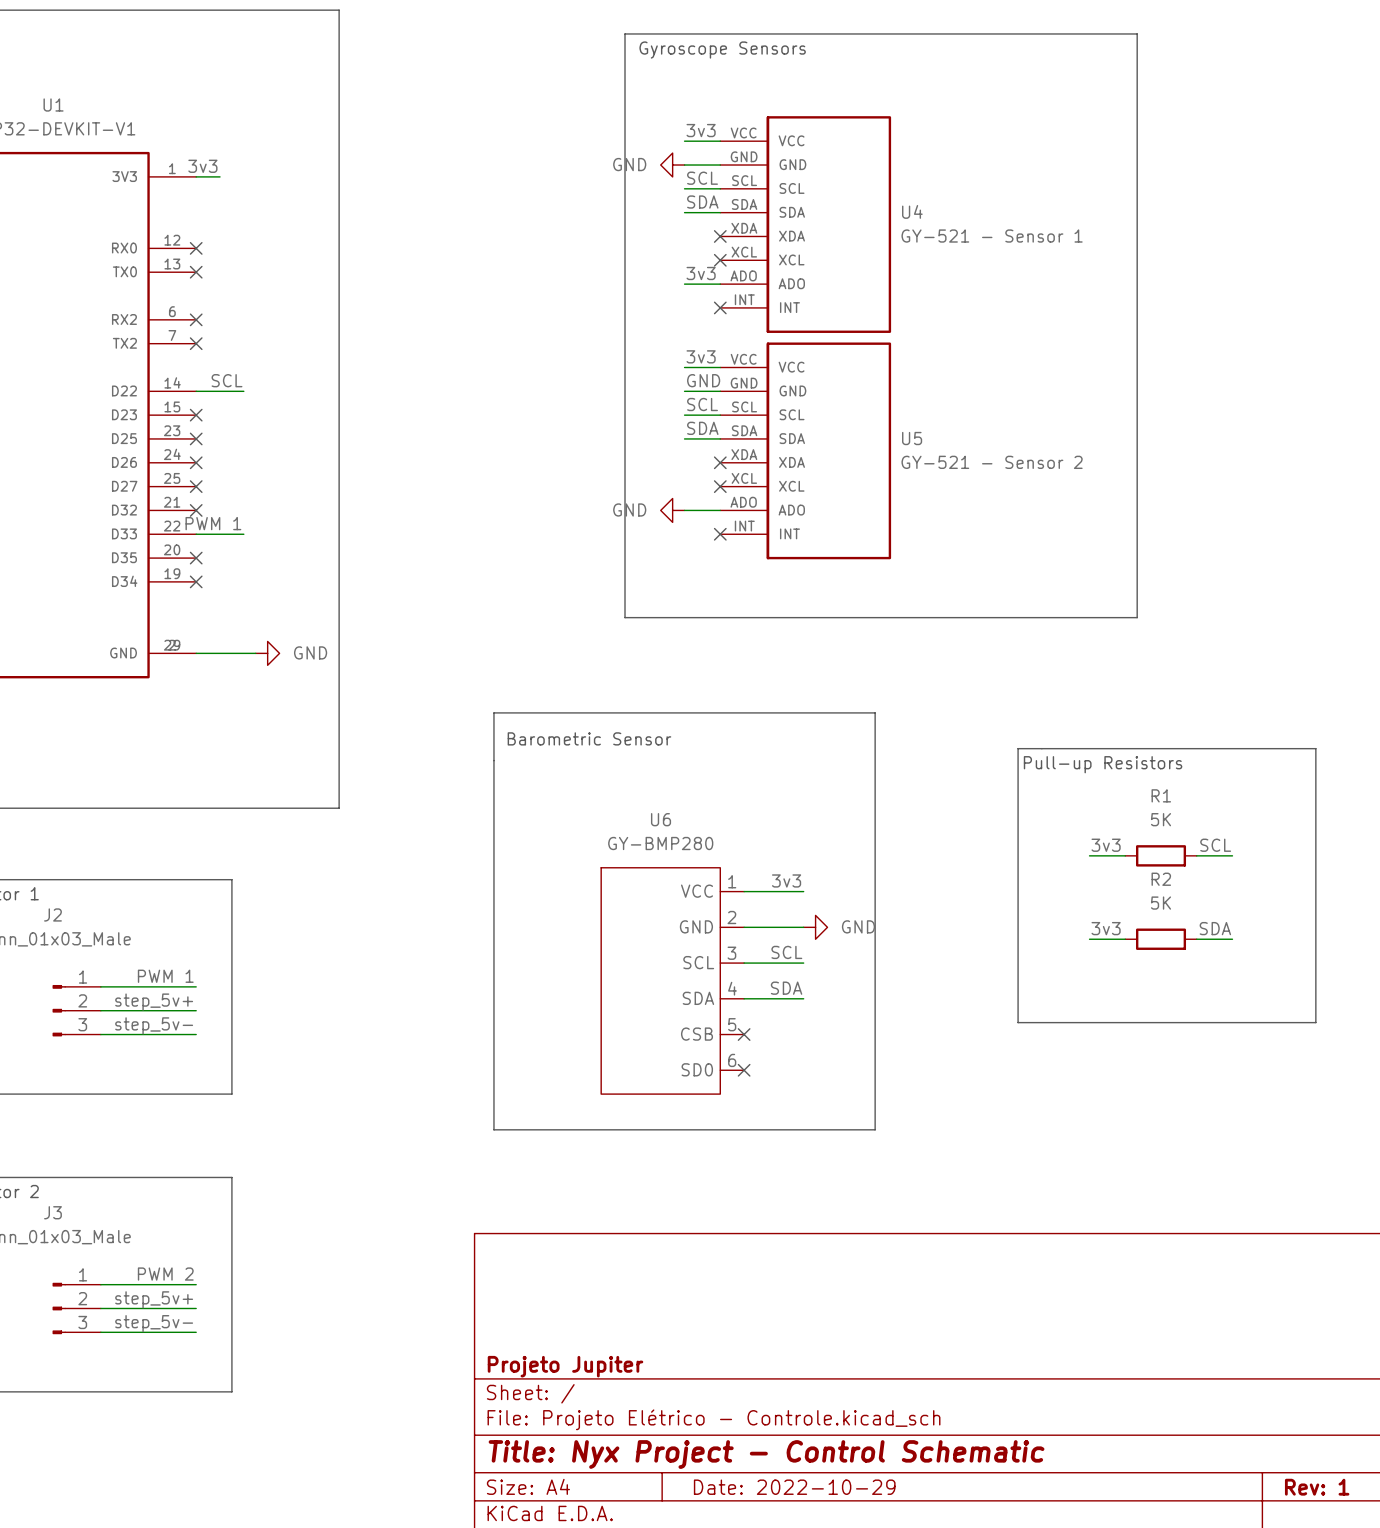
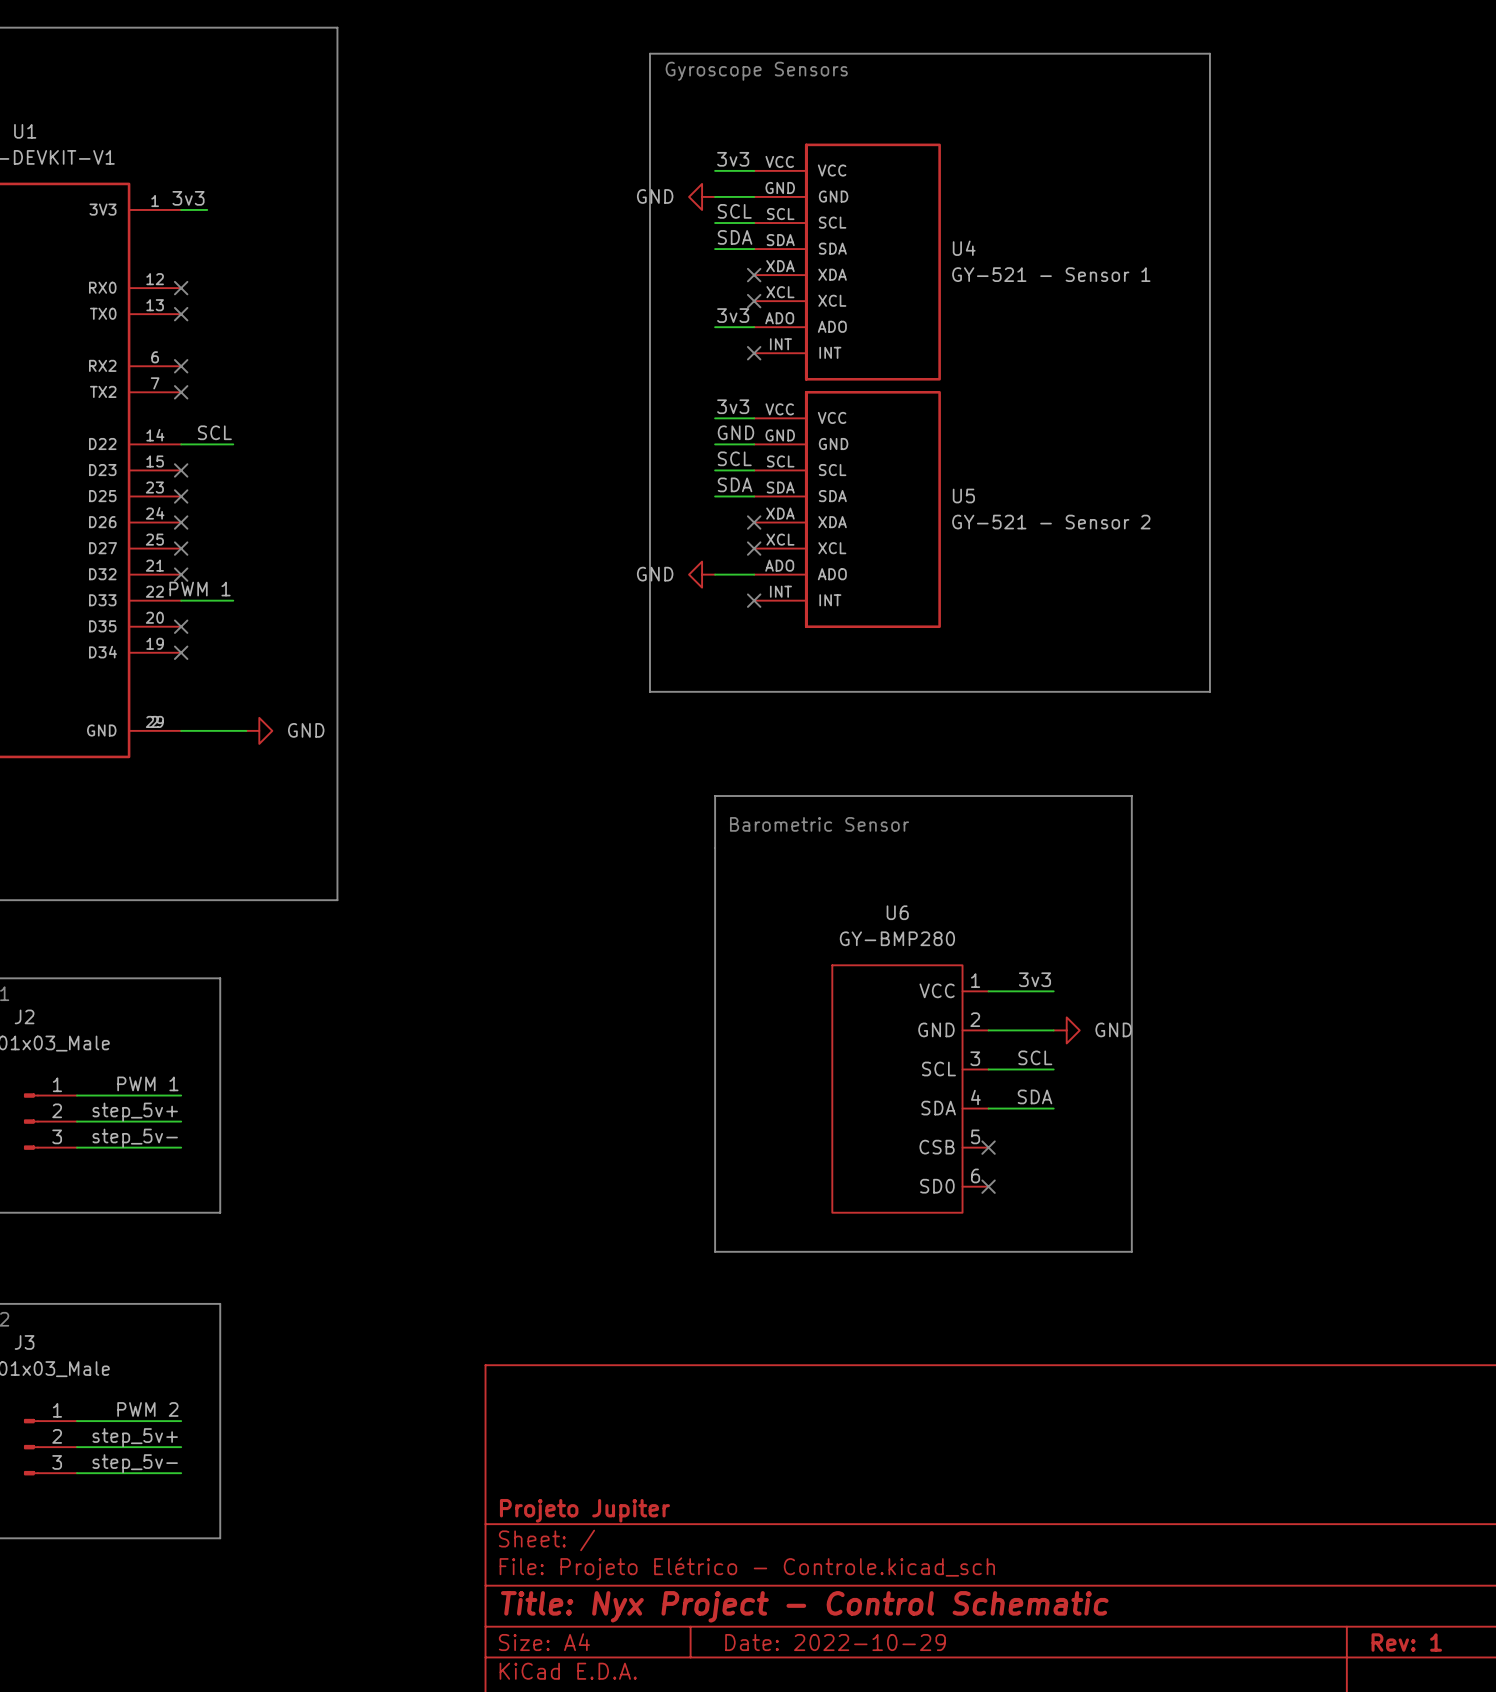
line: (684, 712) (493, 712) (493, 1129) (684, 1129) -> (715, 796) (715, 1251)
line: (875, 712) (875, 1129) -> (923, 796) (1131, 796) (1131, 1251) (923, 1251)
text position: Barometric Sensor (589, 738) -> Barometric Sensor (819, 824)
line: (1018, 748) (1018, 1022) (1315, 1022) (1315, 748) (1018, 748) -> none
text: Pull-up Resistors (1103, 764) -> none
label: 3v3 (1106, 845) -> none
label: SCL (1215, 845) -> none
wire: (1089, 855) (1125, 855) -> none
R1: 5K (1161, 855) -> none
wire: (1196, 855) (1232, 855) -> none
label: 3v3 (786, 880) -> none
label: none -> 3v3 (1034, 979)
wire: (744, 891) (803, 891) -> (988, 991) (1053, 991)
wire: (744, 927) (803, 927) -> (988, 1030) (1053, 1030)
power symbol position: GND (815, 927) -> GND (1066, 1030)
label: 3v3 (1106, 928) -> none
label: SDA (1215, 928) -> none
wire: (1089, 939) (1125, 939) -> none
R2: 5K (1161, 939) -> none
wire: (1196, 939) (1232, 939) -> none
label: SCL (786, 952) -> none
label: none -> SCL (1035, 1057)
wire: (744, 963) (803, 963) -> (988, 1069) (1053, 1069)
U6 position: (672, 980) -> (910, 1089)
label: SDA (786, 988) -> none
label: none -> SDA (1034, 1096)
wire: (744, 998) (803, 998) -> (988, 1108) (1053, 1108)
no-connect mark: (744, 1034) -> none
no-connect mark: none -> (988, 1147)
no-connect mark: (744, 1070) -> none
no-connect mark: none -> (988, 1186)

